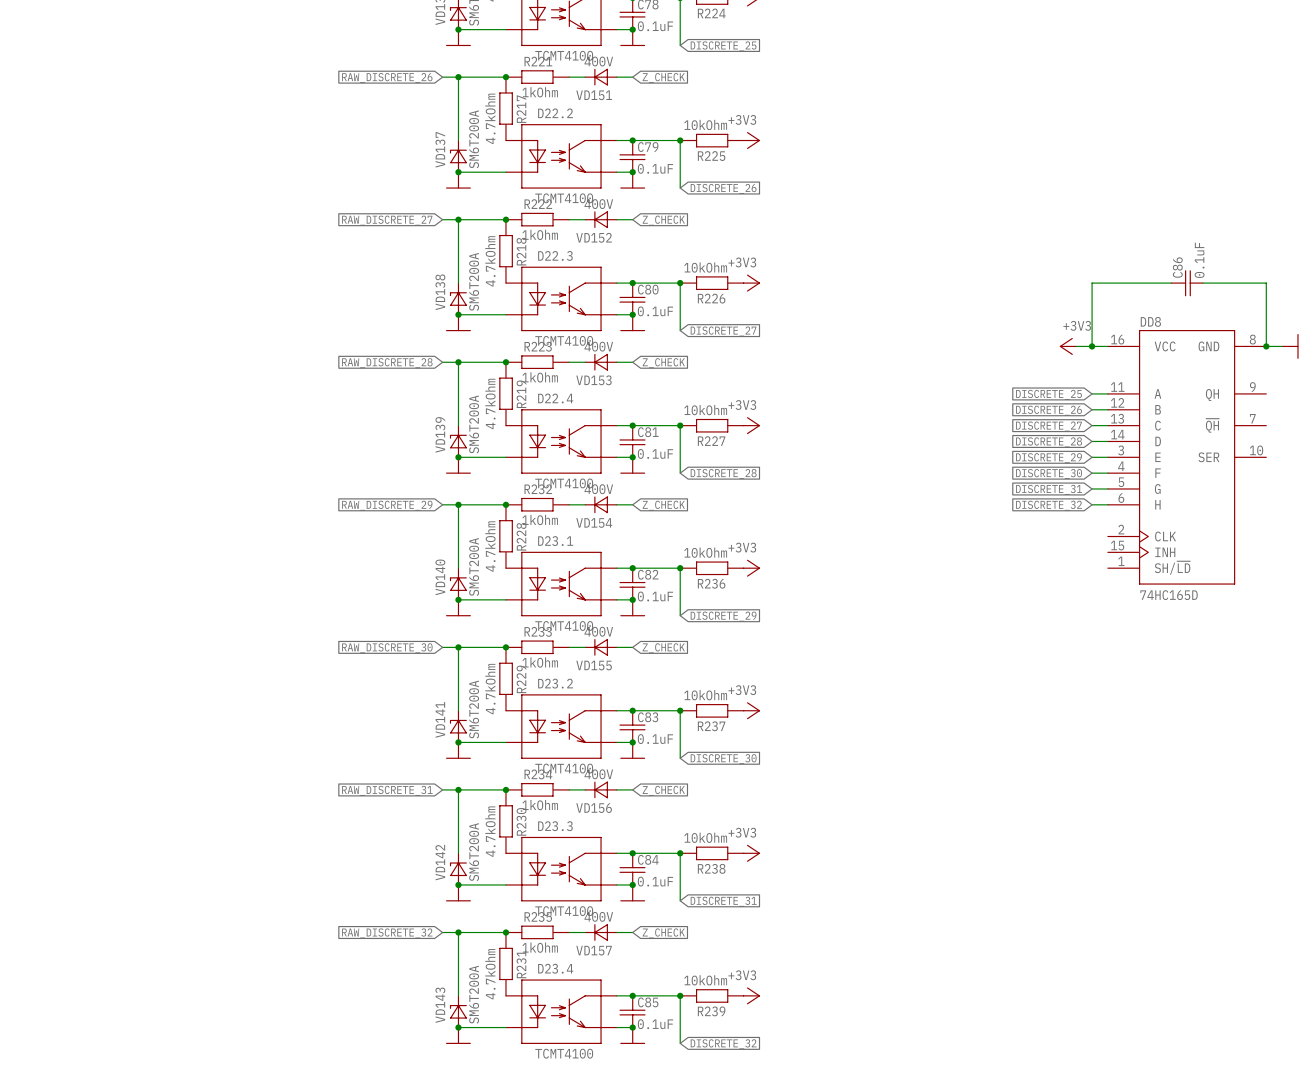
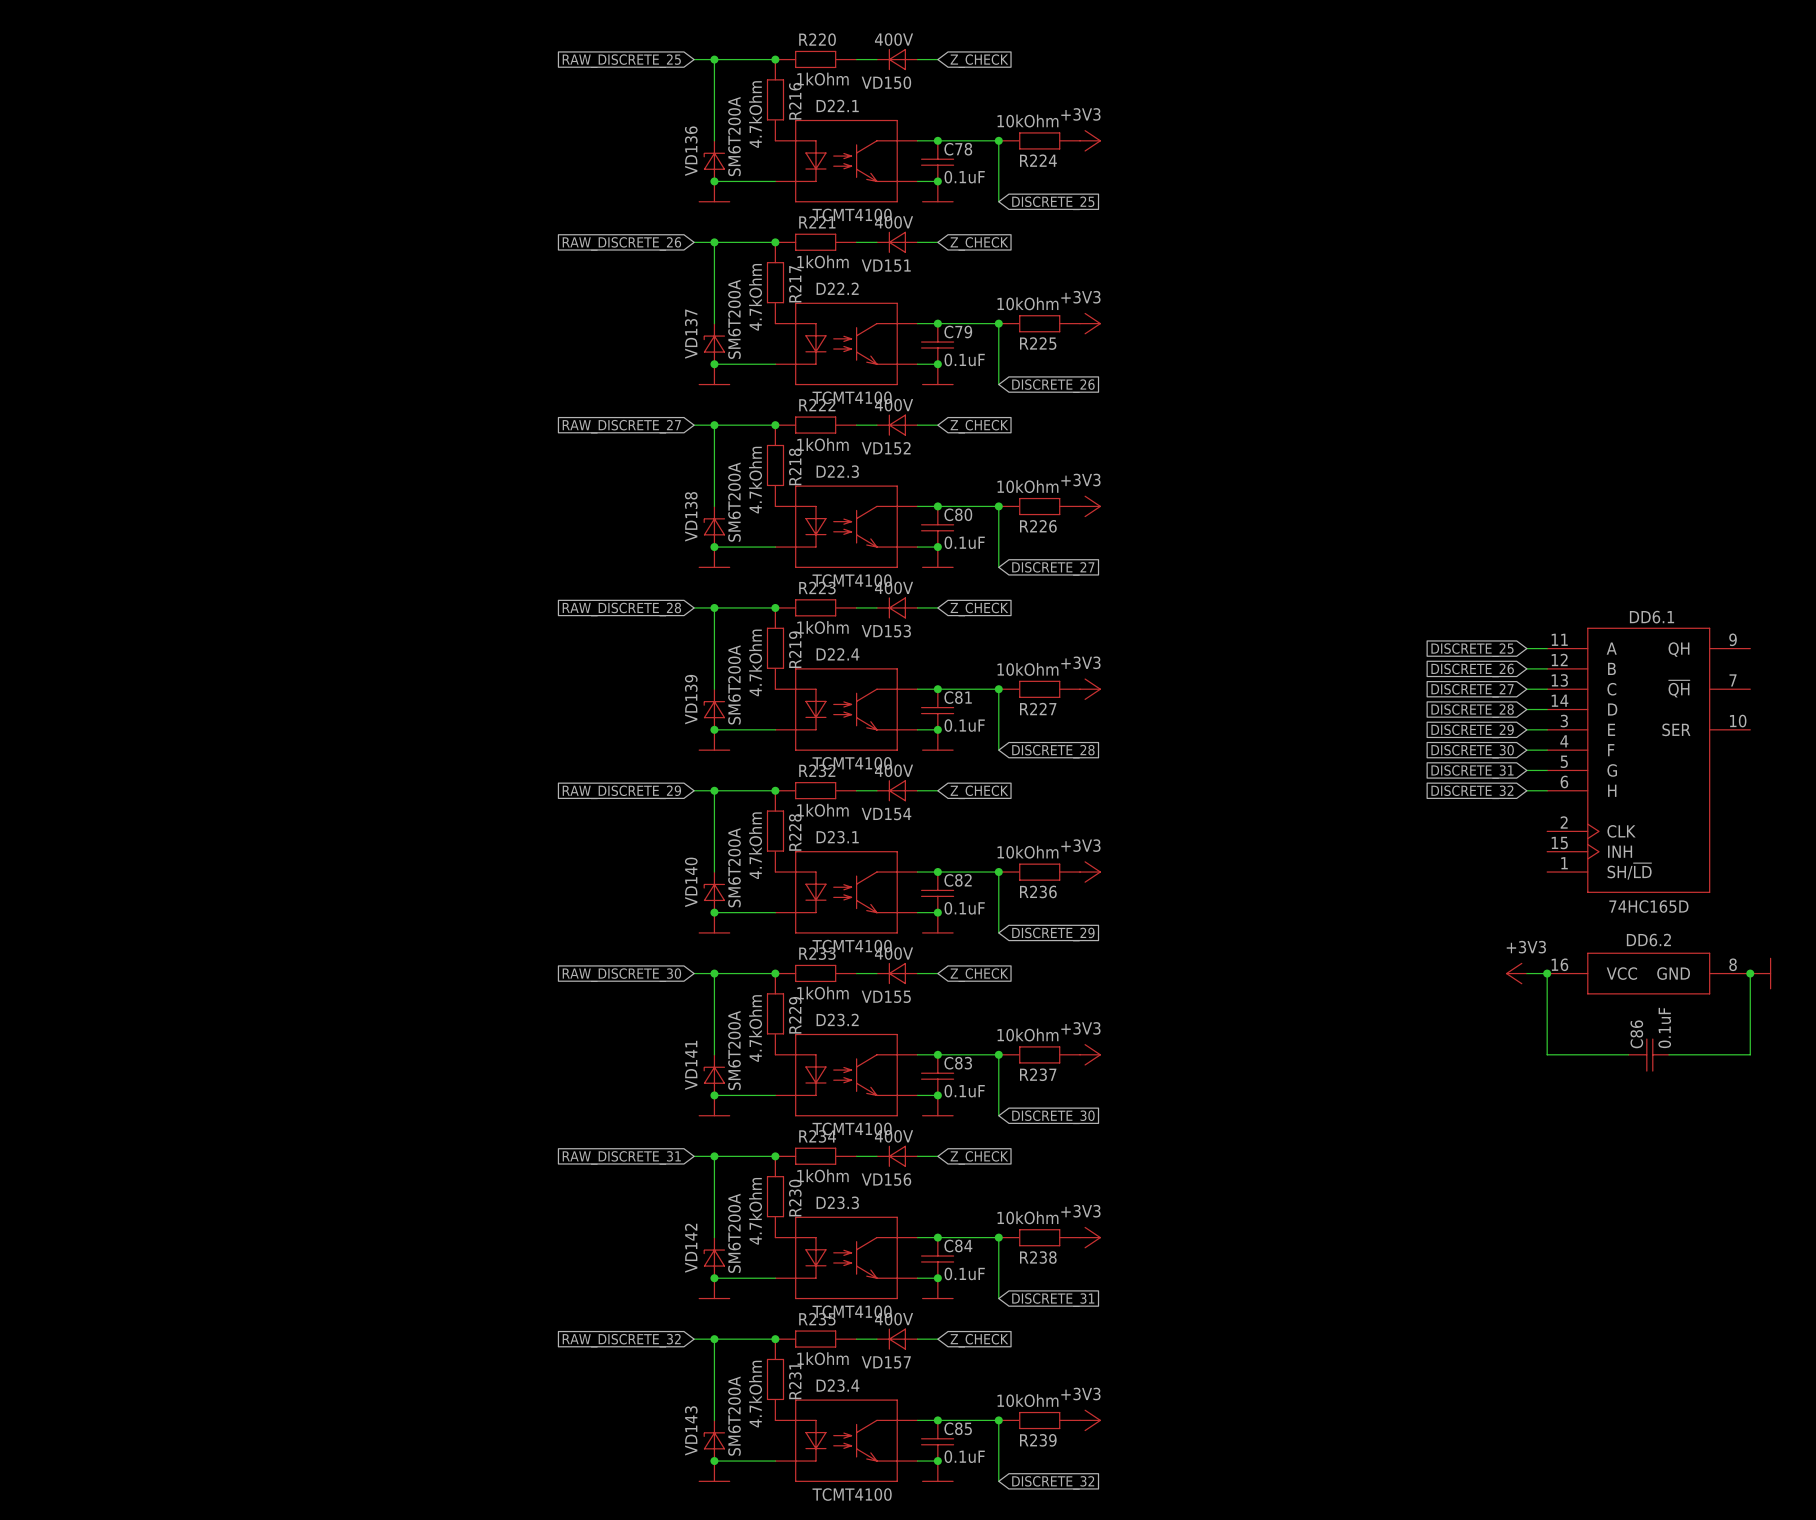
wire: (1171, 283) (1092, 283) (1092, 346) -> none
C86 position: (1187, 283) -> (1648, 1055)
wire: (1202, 283) (1266, 283) (1266, 346) (1282, 346) -> none
power symbol: +3V3 (1068, 346) -> none
wire: (1076, 346) (1107, 346) -> none
junction: (1092, 346) -> none
junction: (1266, 346) -> none
power symbol: (1290, 346) -> none
DD8: 74HC165D (1187, 457) -> none
DD6.1: none -> 74HC165D (1648, 760)
power symbol: none -> +3V3 (1516, 973)
wire: none -> (1526, 973) (1547, 973) (1547, 1054) (1628, 1054)
junction: none -> (1547, 973)
DD6.2: none -> (1648, 973)
wire: none -> (1750, 973) (1750, 1054) (1669, 1054)
junction: none -> (1750, 973)
power symbol: none -> (1760, 973)

